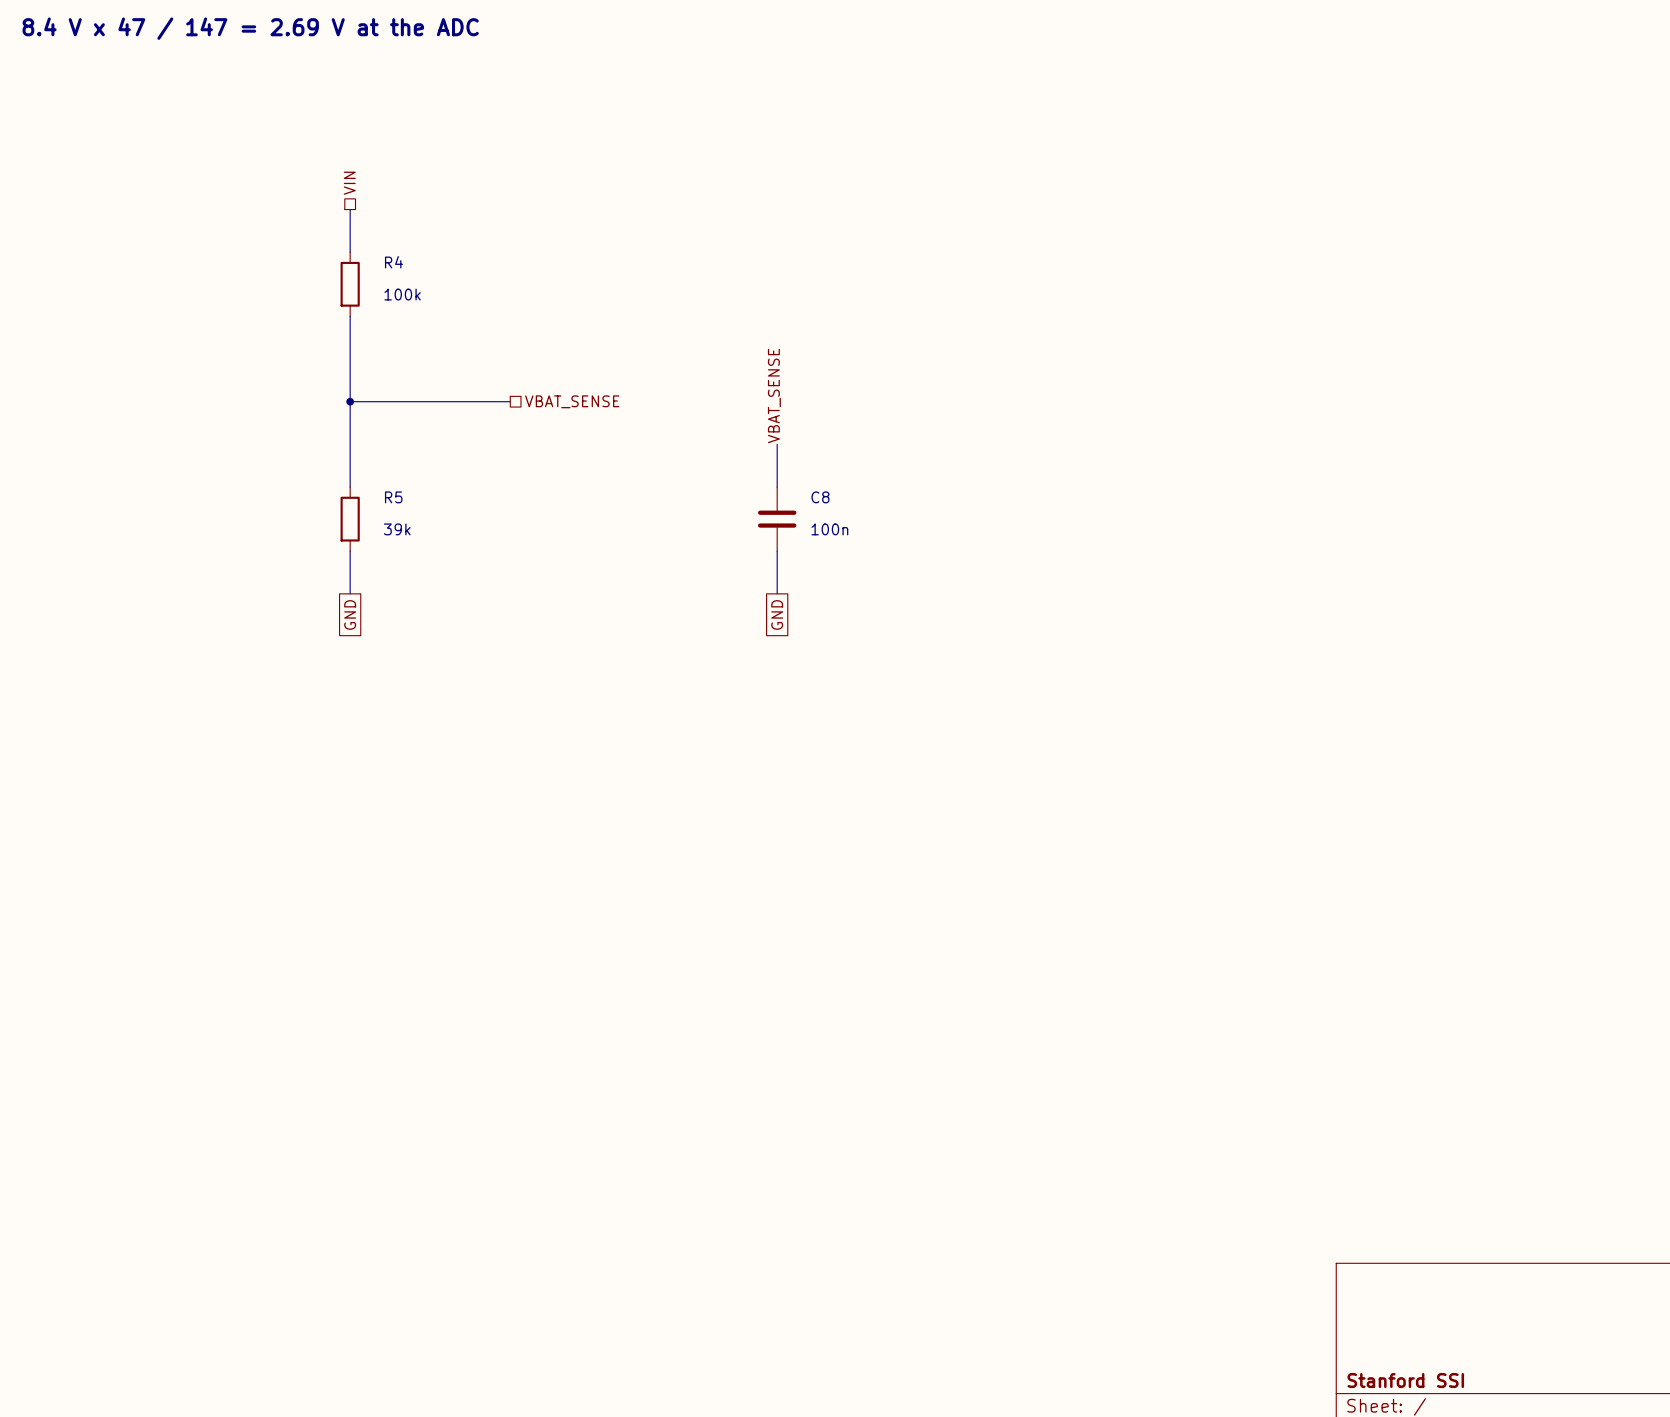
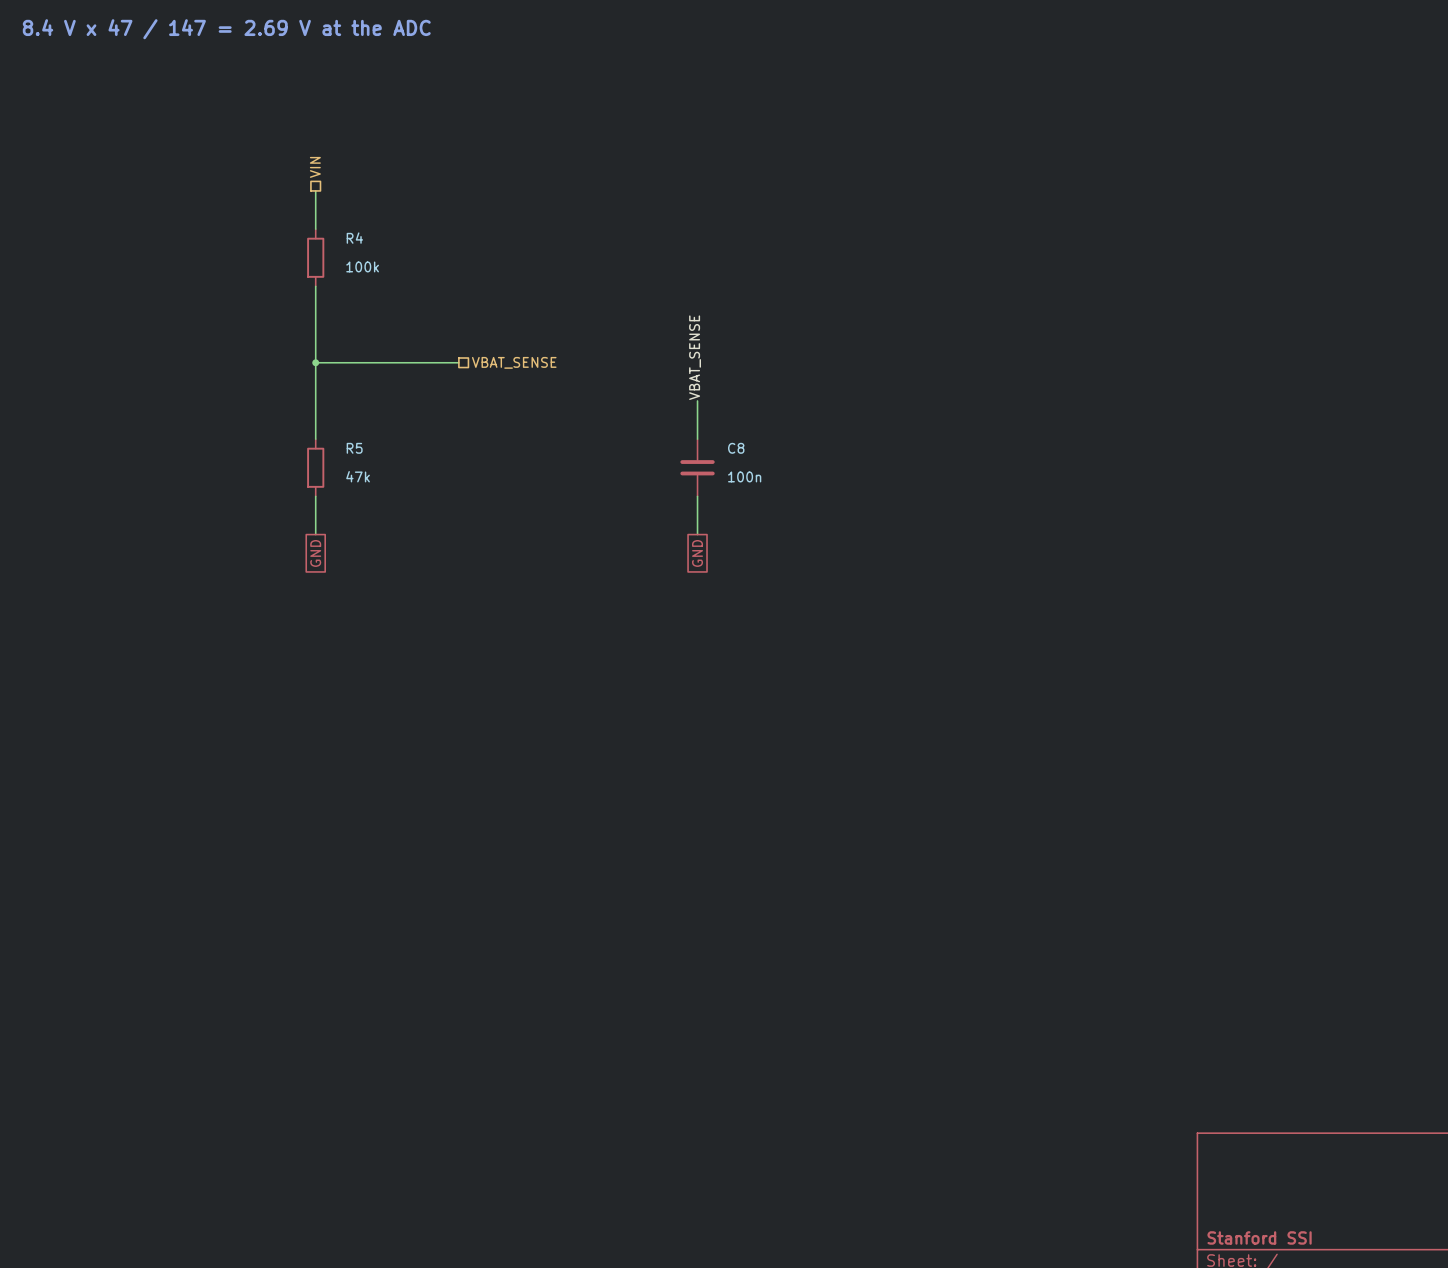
R5 value: 39k (397, 529) -> 47k (358, 476)

